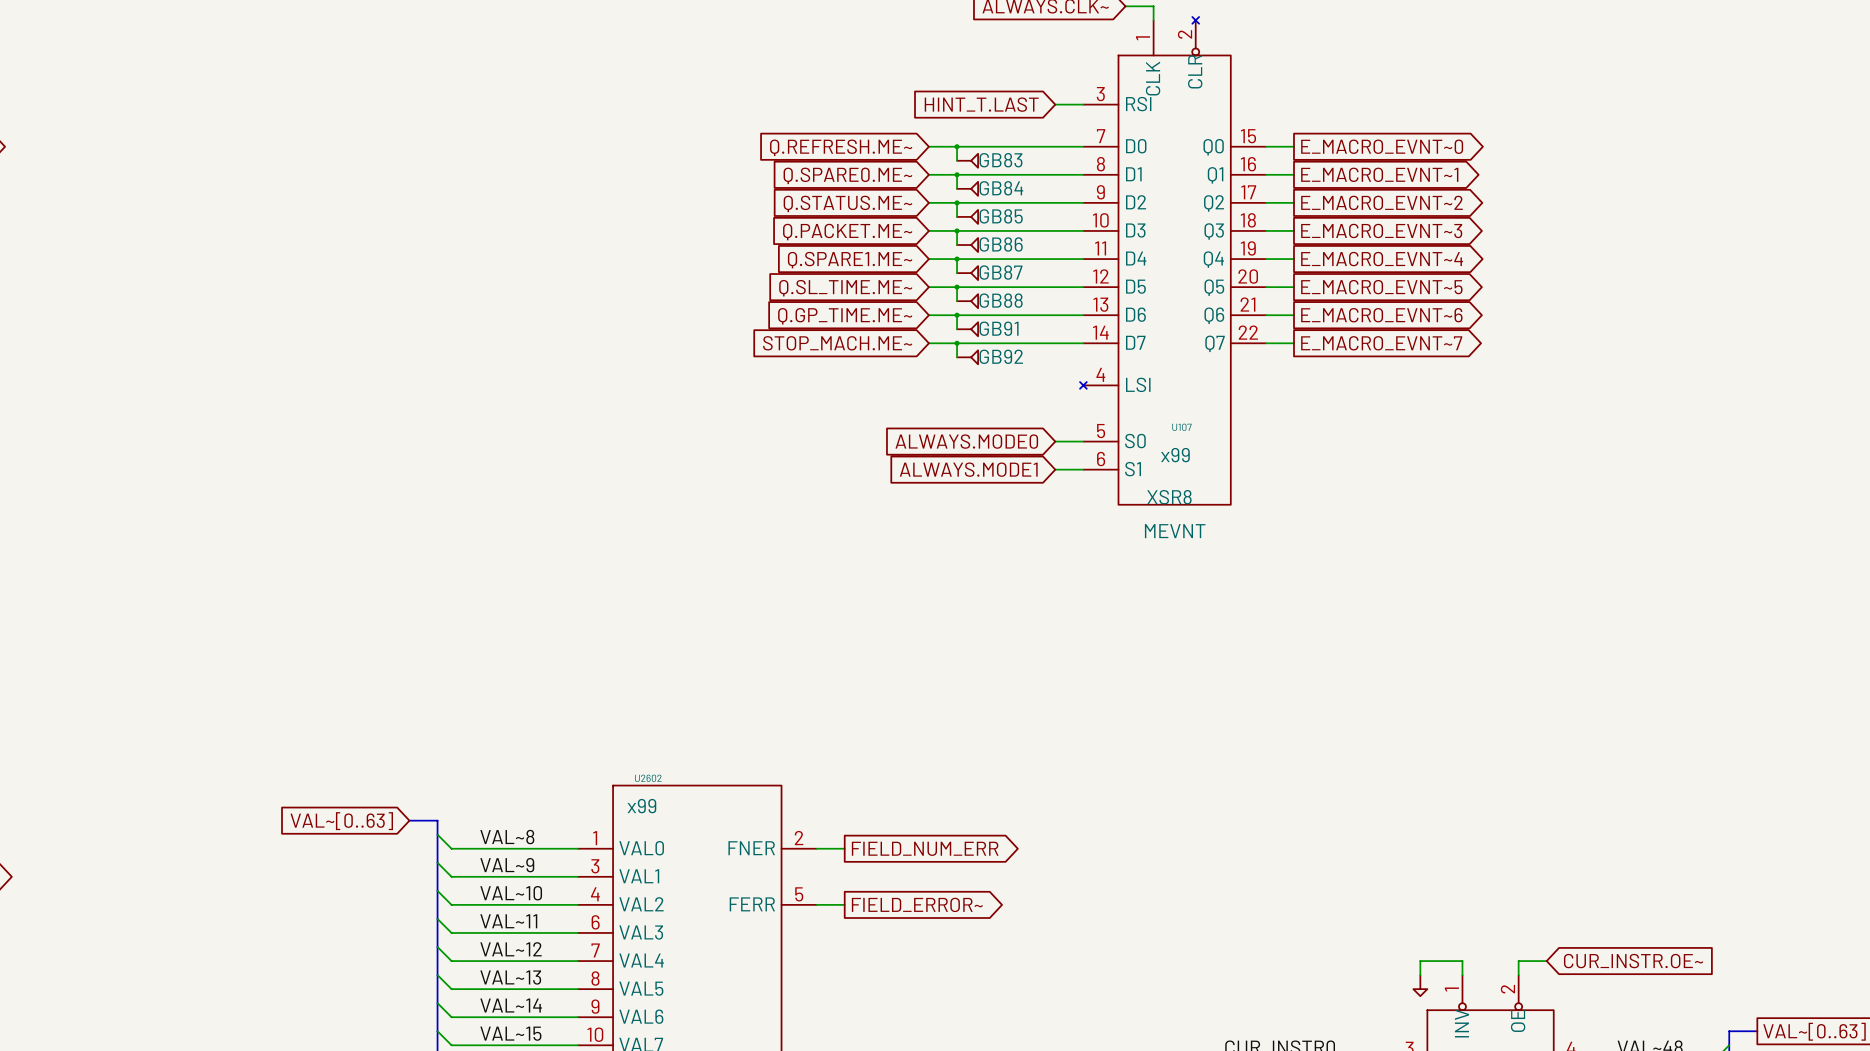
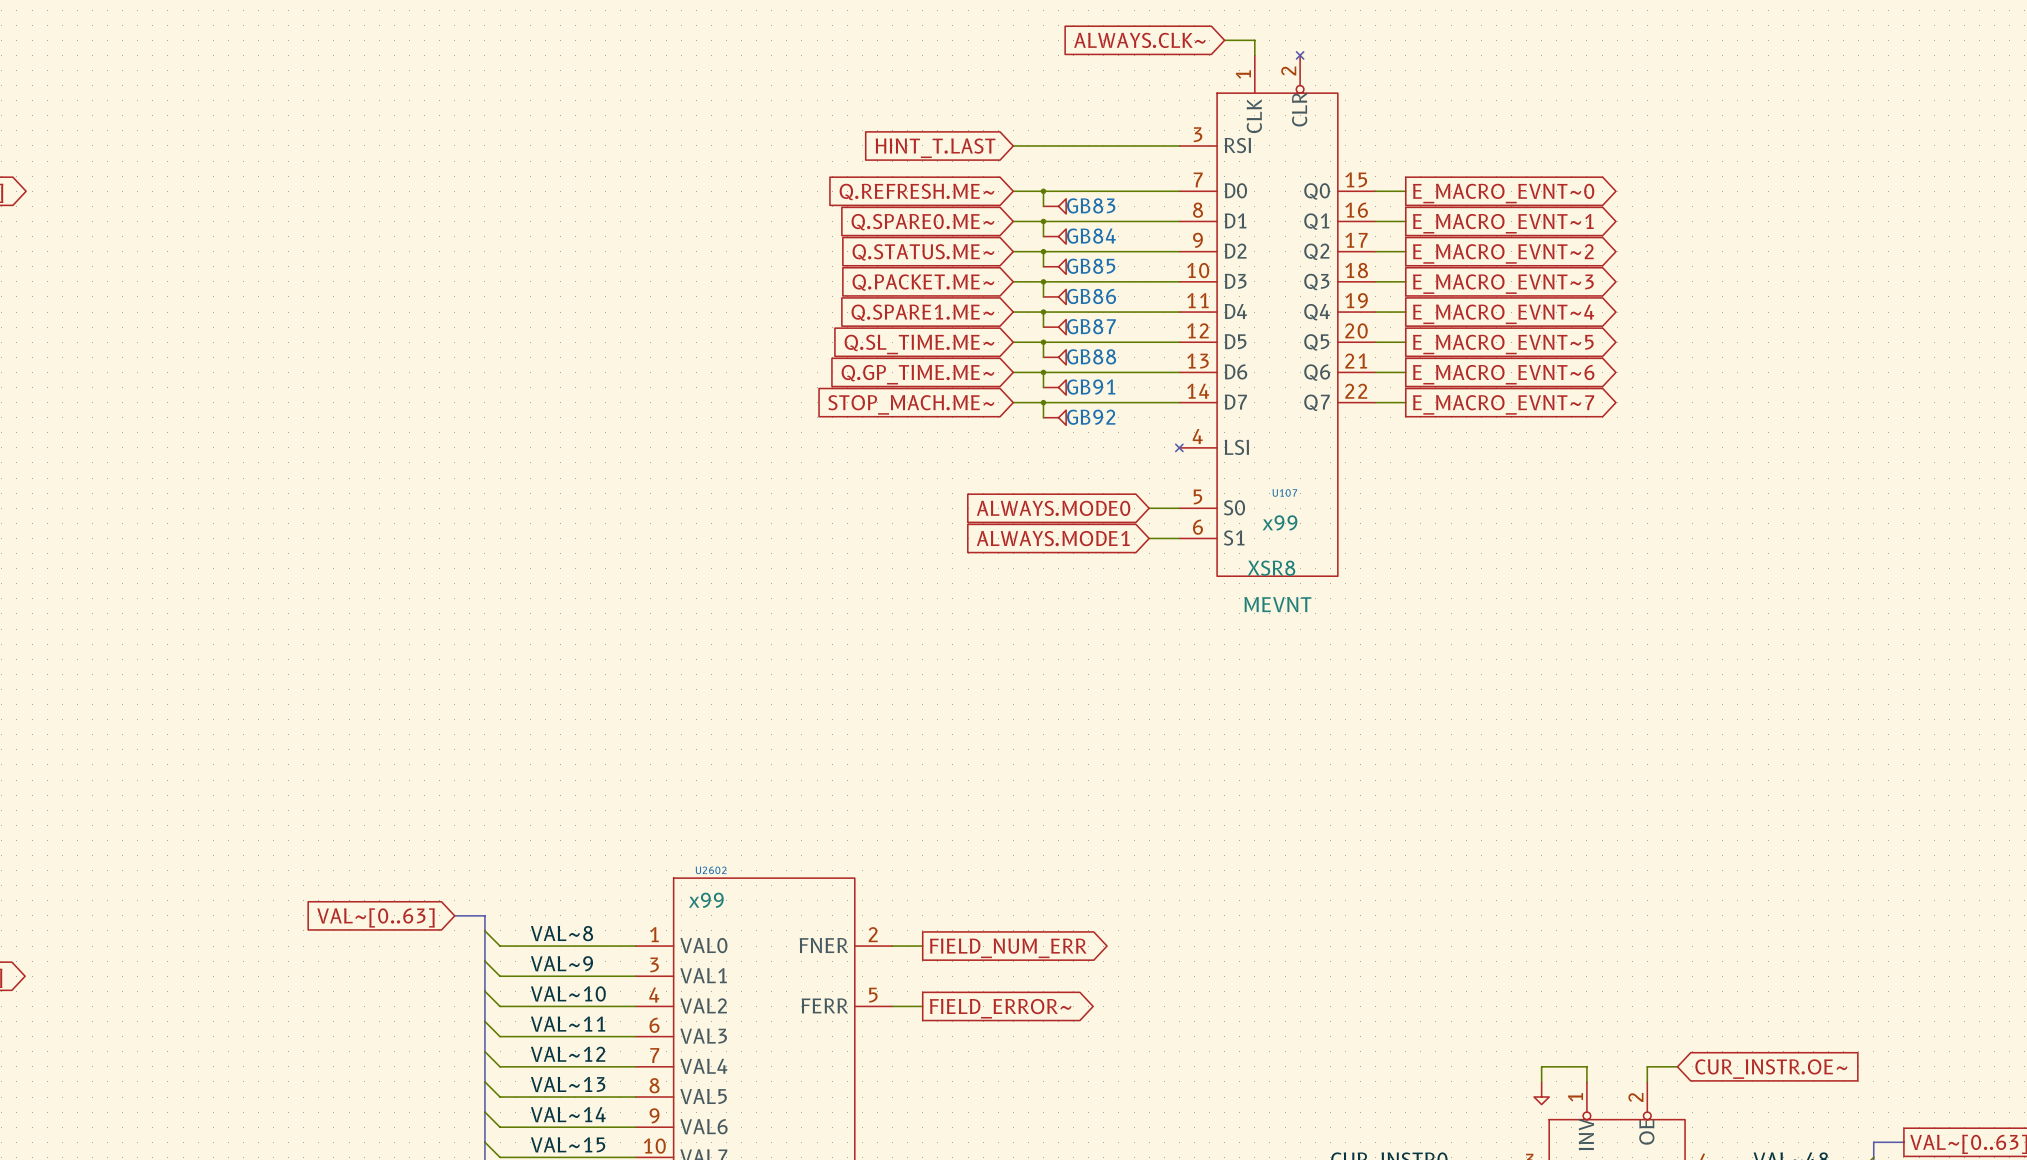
wire: none -> (1013, 145) (1149, 145)
global label position: HINT_T.LAST (981, 104) -> HINT_T.LAST (935, 148)

